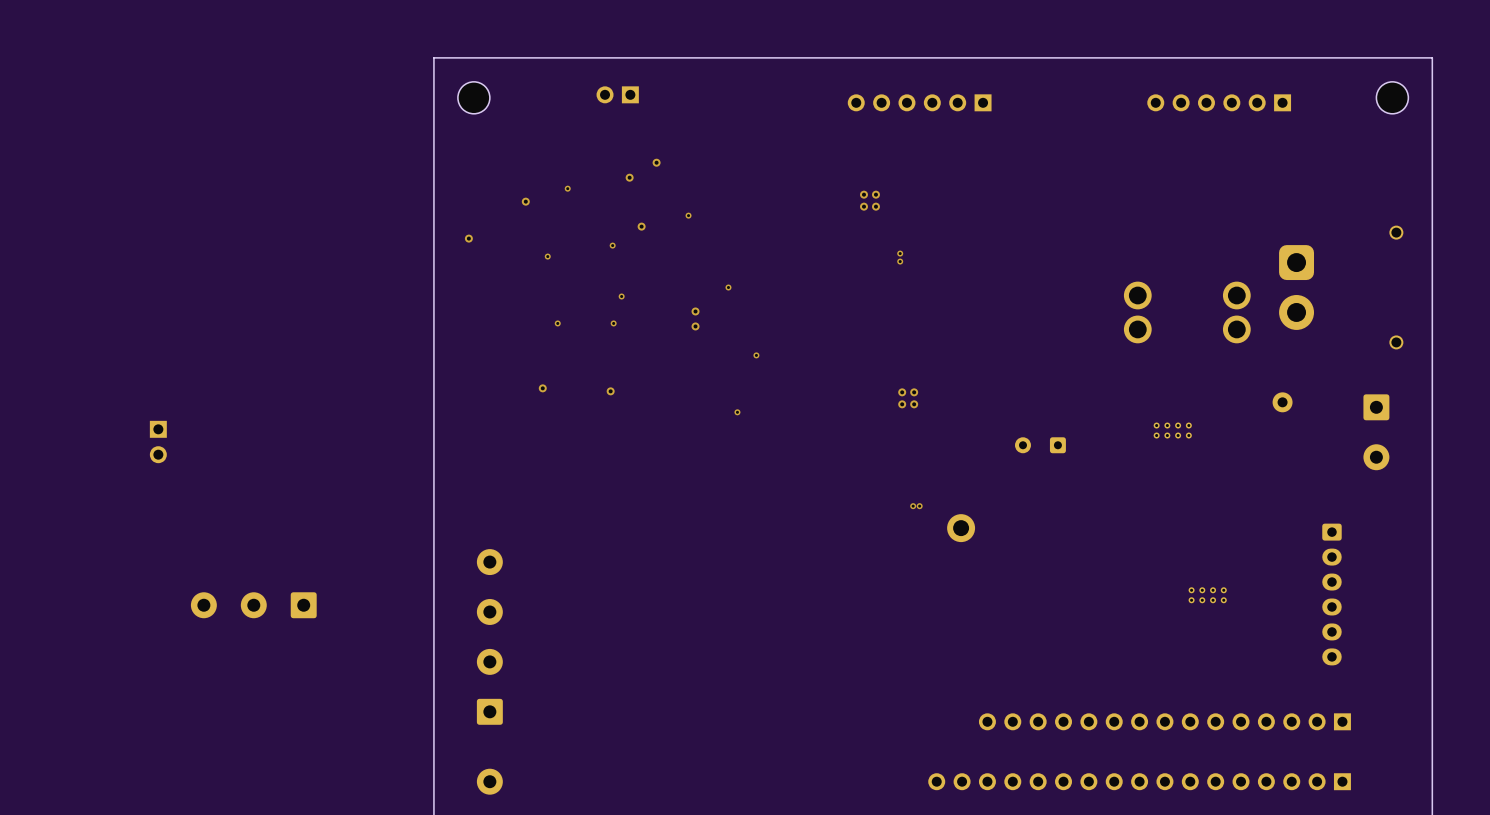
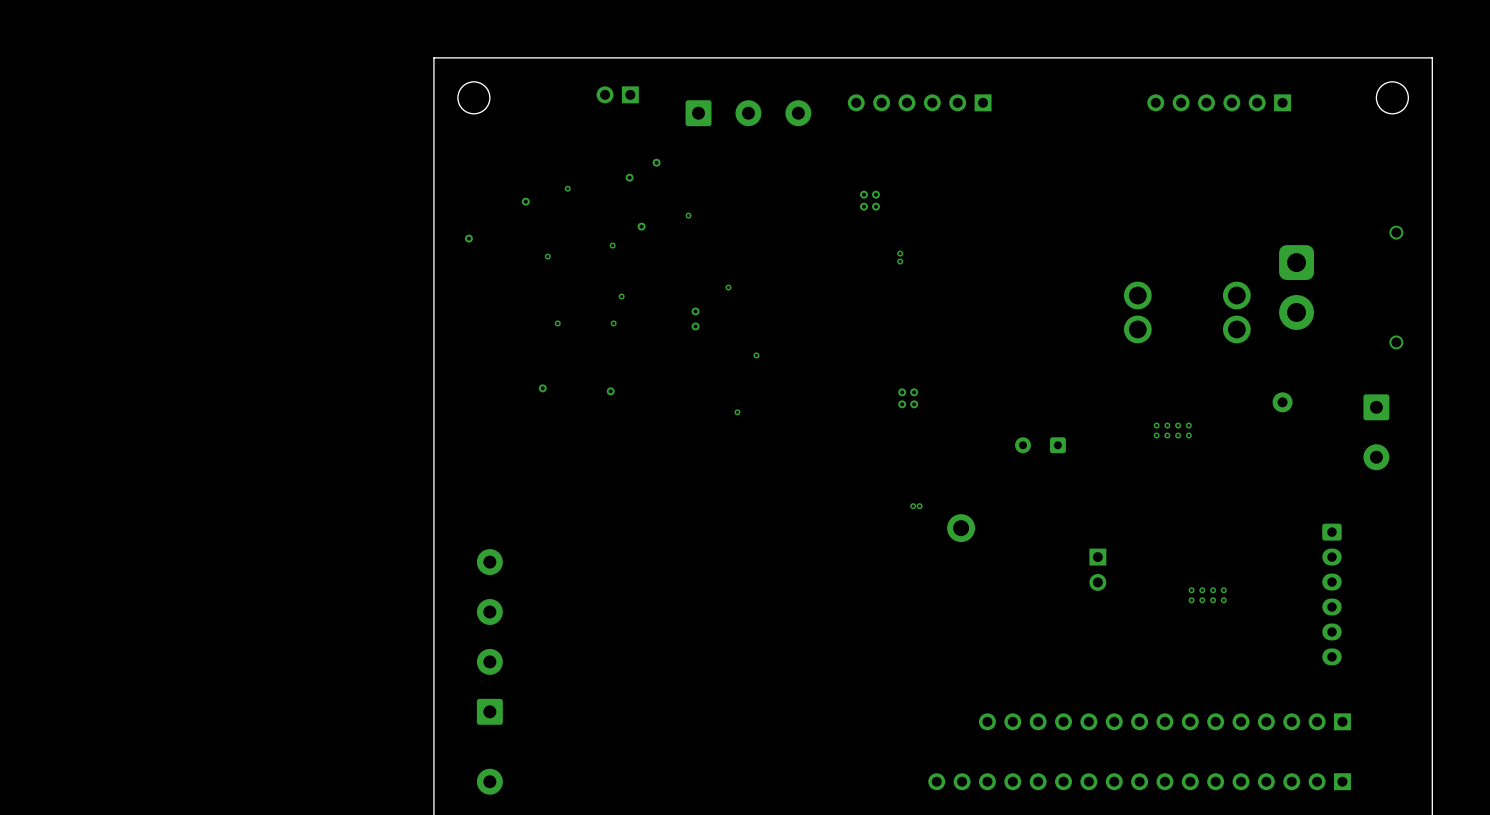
part: none -> (748, 113)
part: (158, 442) -> none
part: none -> (1097, 569)
part: (253, 605) -> none

